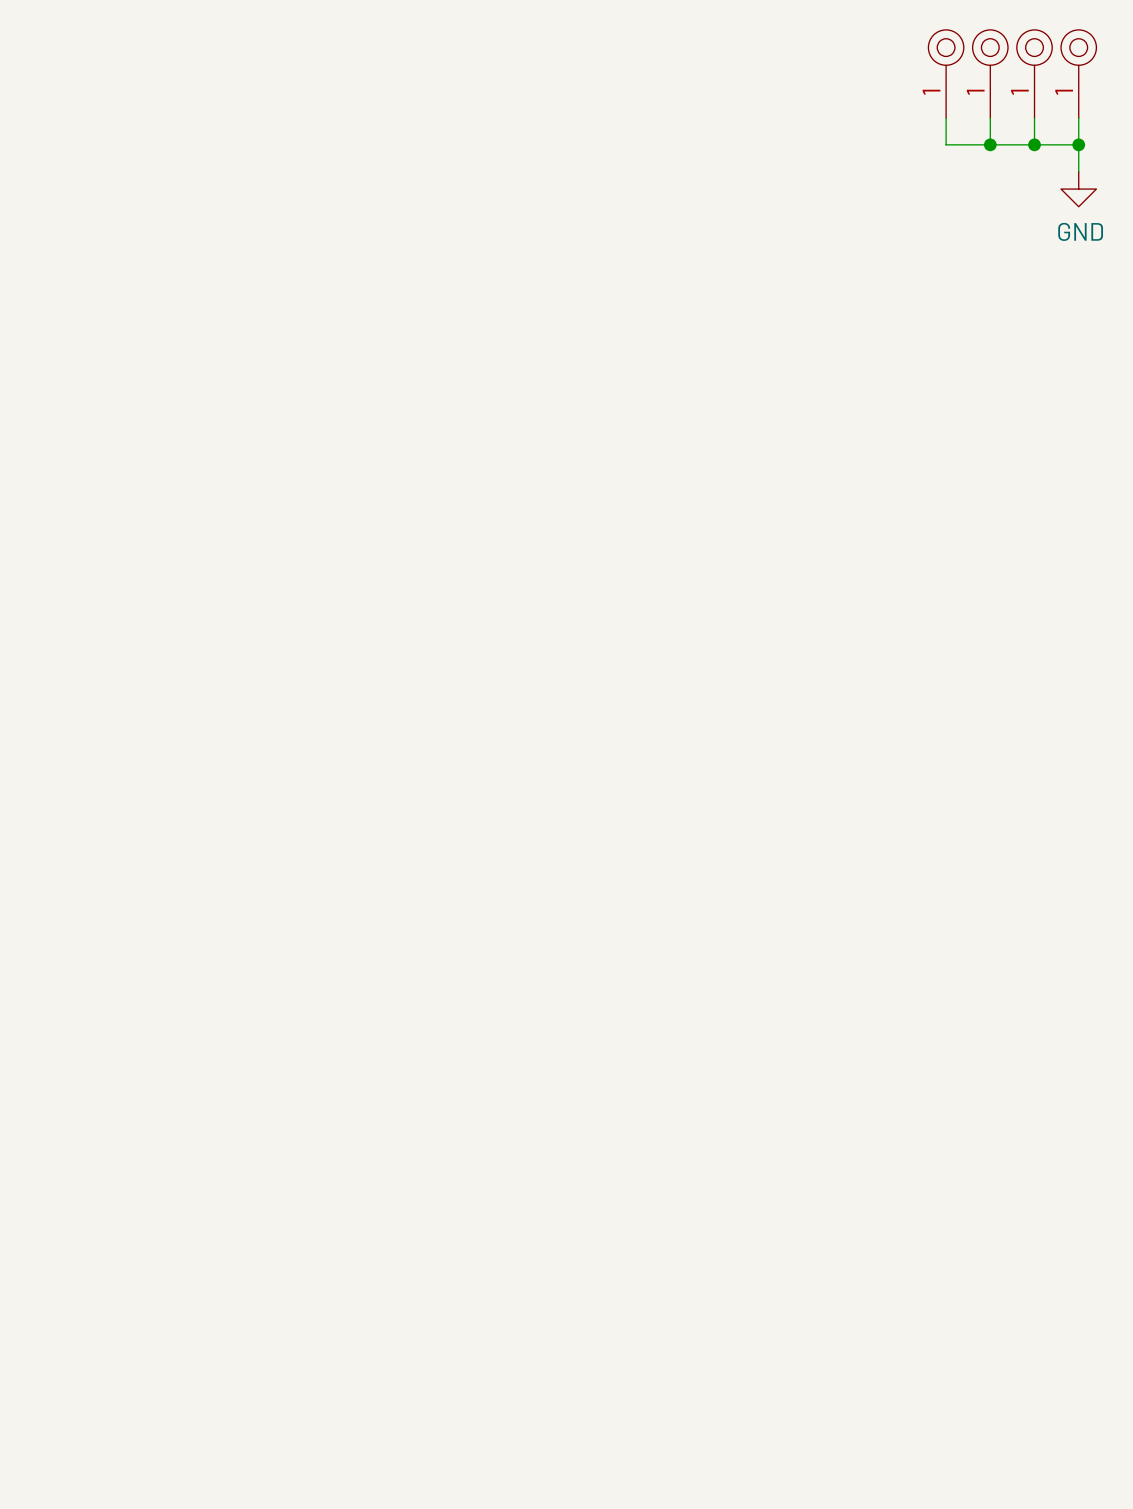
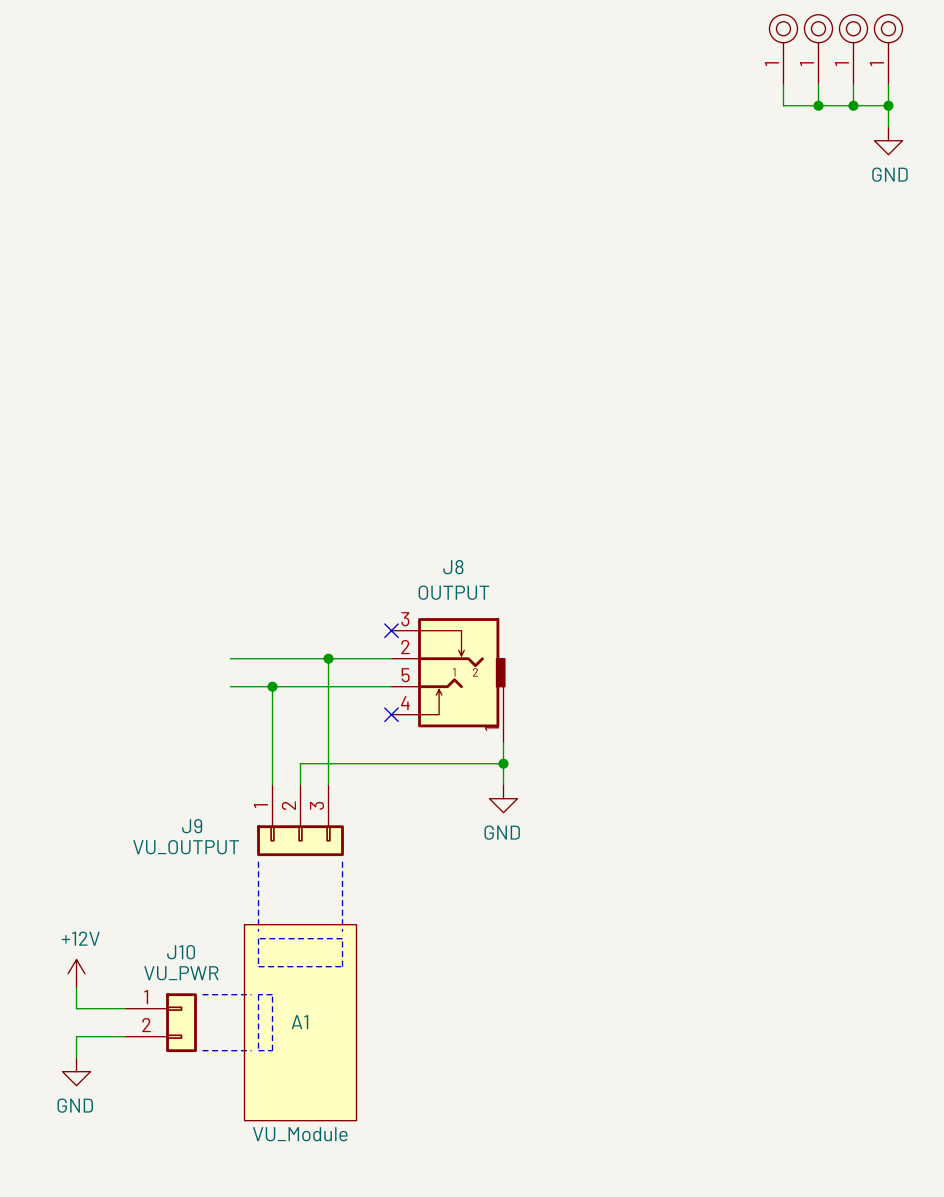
no-connect mark: none -> (391, 630)
wire: none -> (230, 658) (391, 658)
wire: none -> (328, 658) (328, 784)
junction: none -> (328, 658)
J8: none -> OUTPUT (448, 680)
wire: none -> (230, 686) (391, 686)
wire: none -> (272, 686) (272, 784)
junction: none -> (272, 686)
no-connect mark: none -> (391, 714)
wire: none -> (503, 742) (503, 784)
wire: none -> (503, 763) (300, 763) (300, 784)
junction: none -> (503, 763)
power symbol: none -> GND (503, 798)
J9: none -> VU_OUTPUT (300, 820)
line: none -> (258, 861) (258, 931)
line: none -> (342, 861) (342, 931)
line: none -> (258, 938) (258, 966) (342, 966) (342, 938) (258, 938)
power symbol: none -> +12V (76, 973)
wire: none -> (76, 987) (76, 1008) (125, 1008)
line: none -> (202, 994) (251, 994)
line: none -> (258, 994) (272, 994) (272, 1050) (258, 1050) (258, 994)
J10: none -> VU_PWR (161, 1022)
A1: none -> VU_Module (300, 1022)
wire: none -> (125, 1036) (76, 1036) (76, 1057)
line: none -> (202, 1050) (251, 1050)
power symbol: none -> GND (76, 1071)

